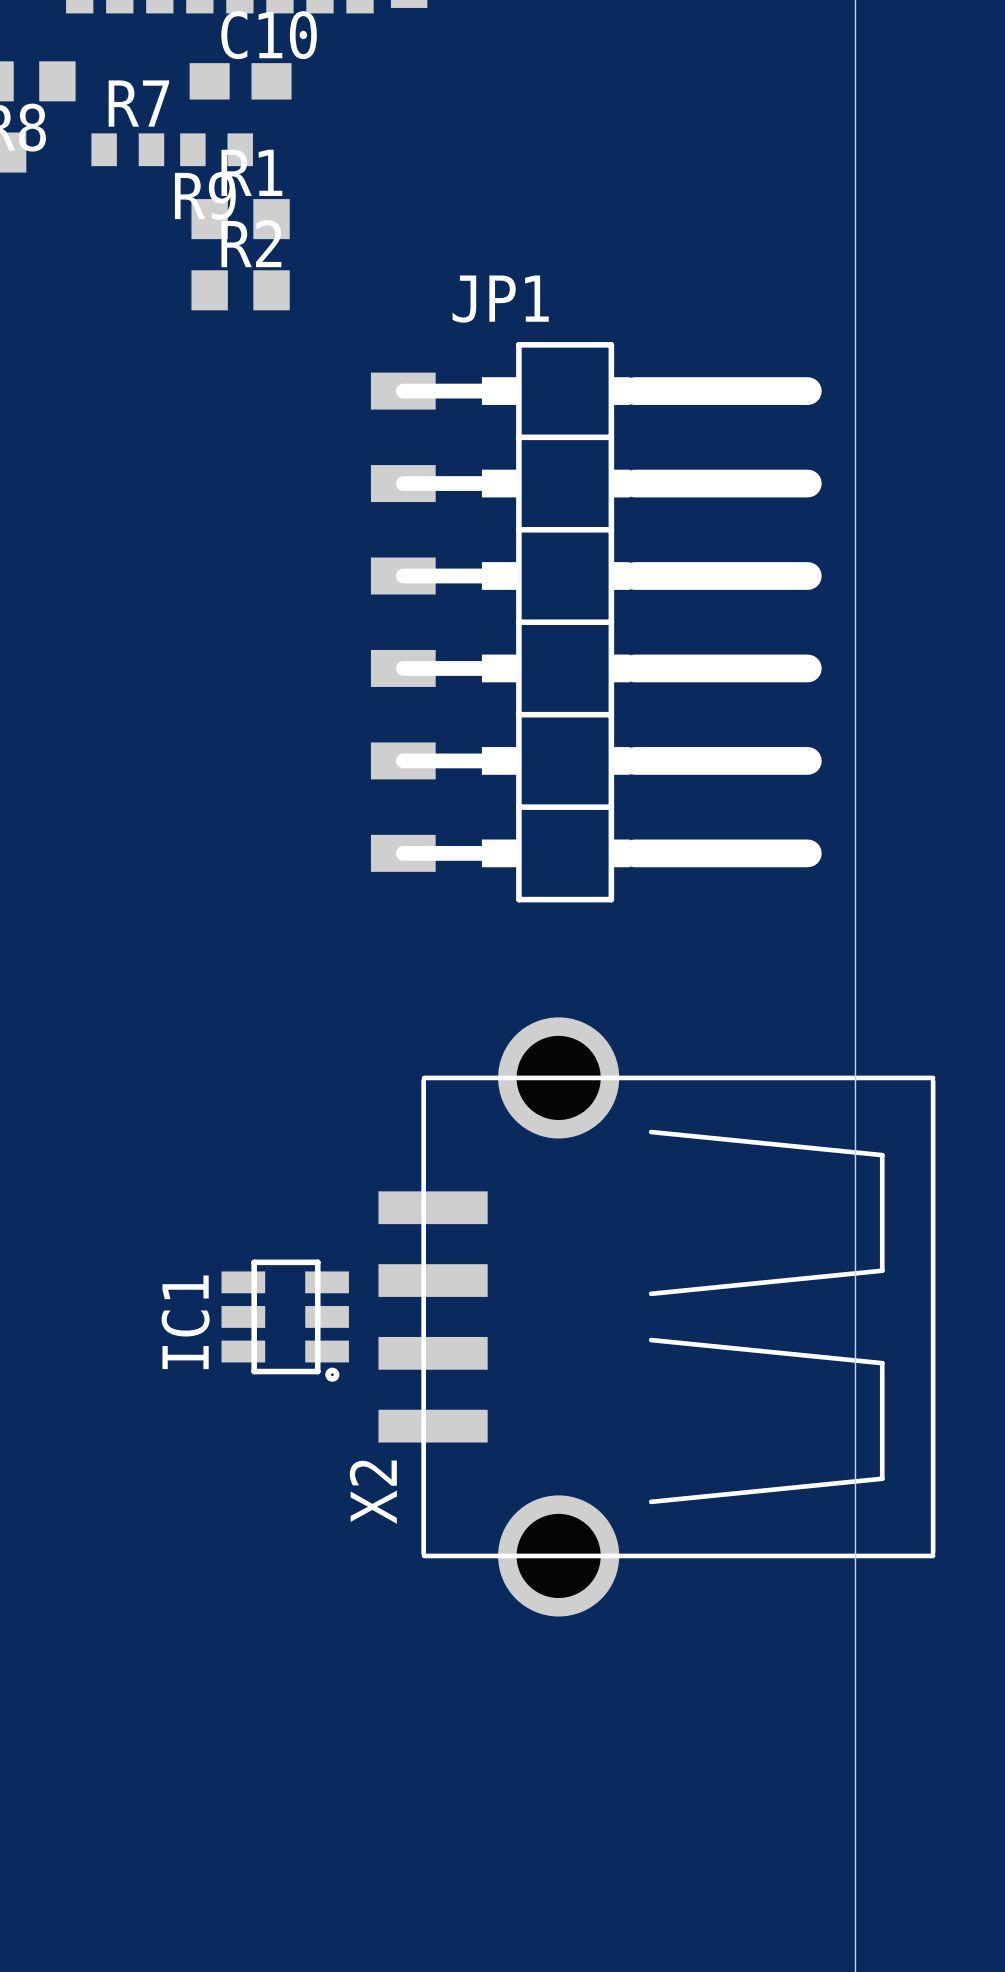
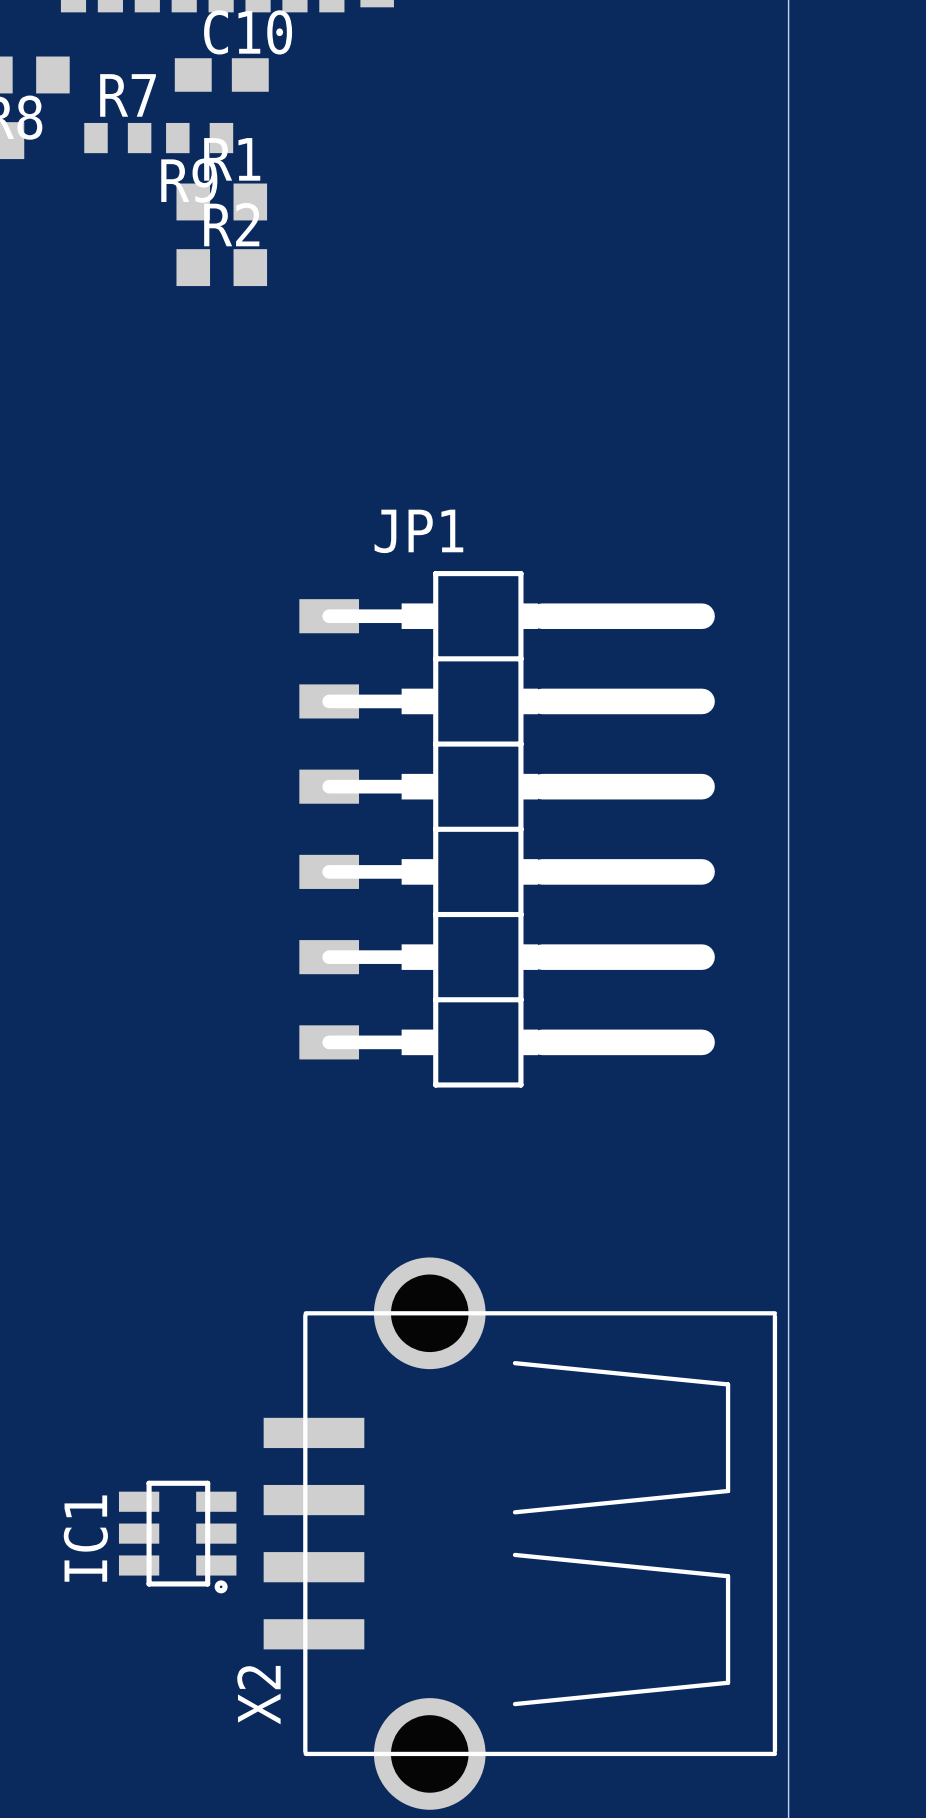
JP1 position: (596, 622) -> (507, 829)
X2 position: (656, 1316) -> (520, 1533)
IC1 position: (285, 1320) -> (177, 1537)

